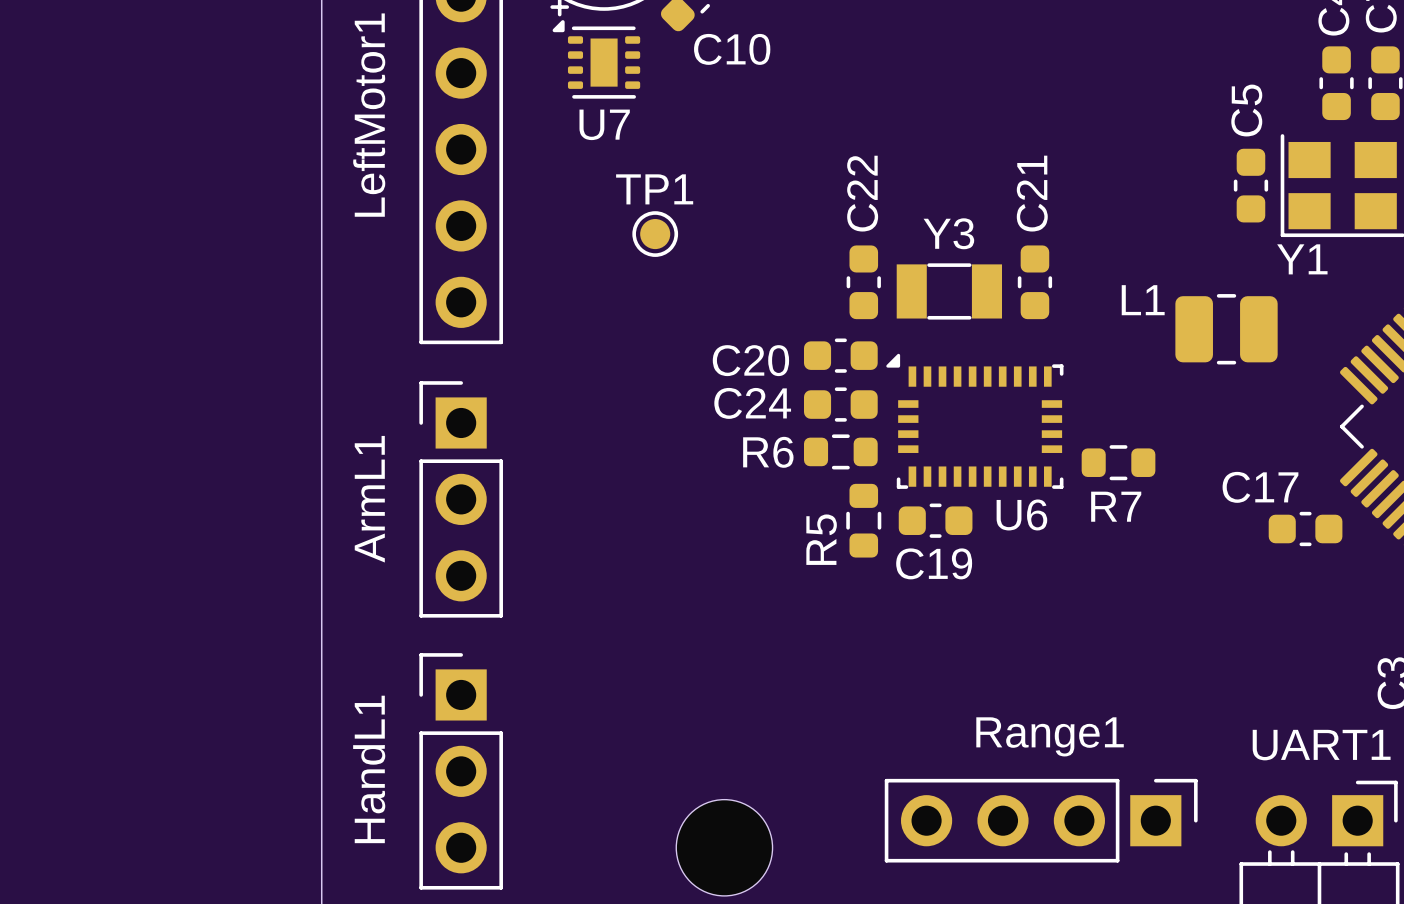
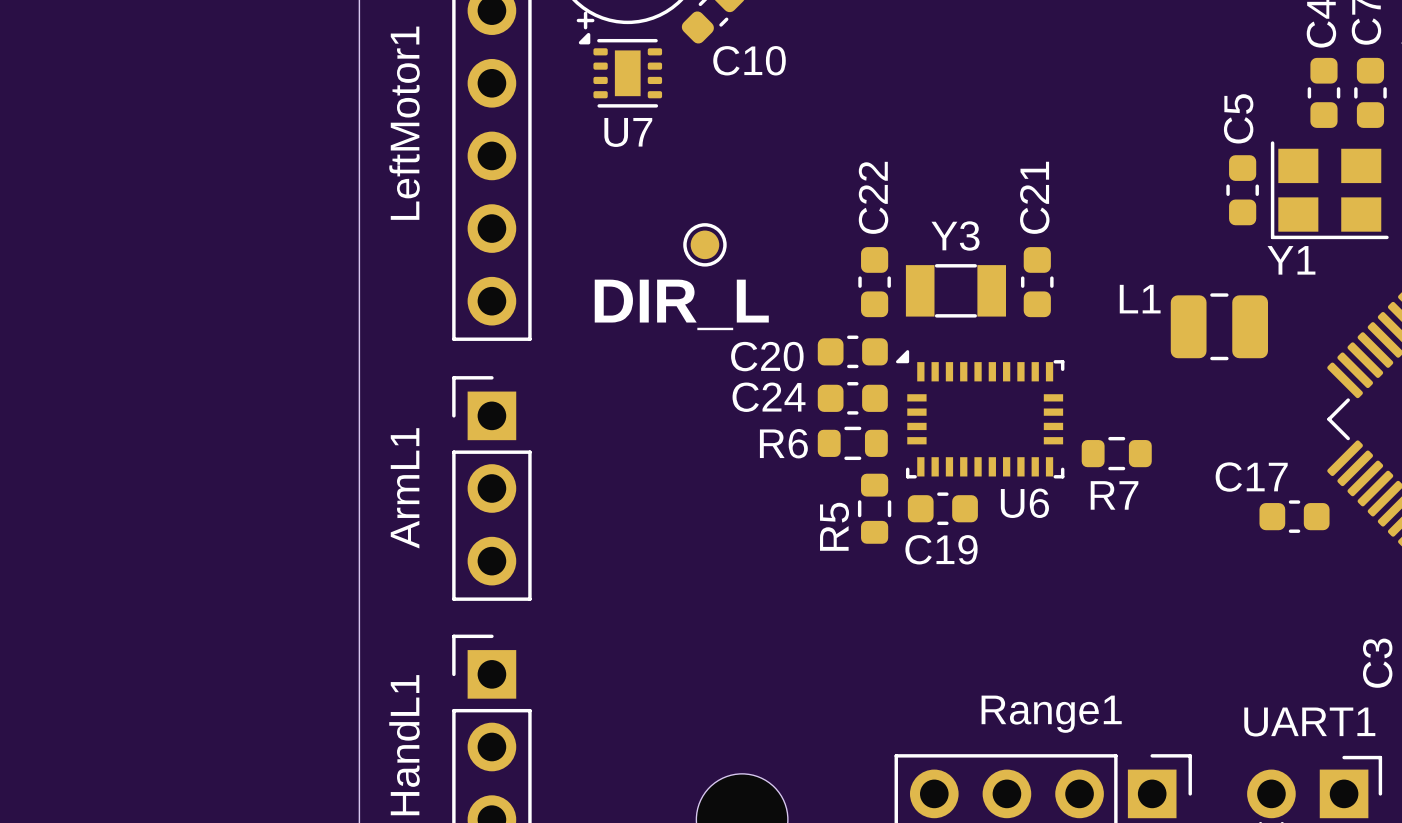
TP1: (655, 234) -> none
part: none -> (704, 244)
text: none -> DIR_L (681, 304)

